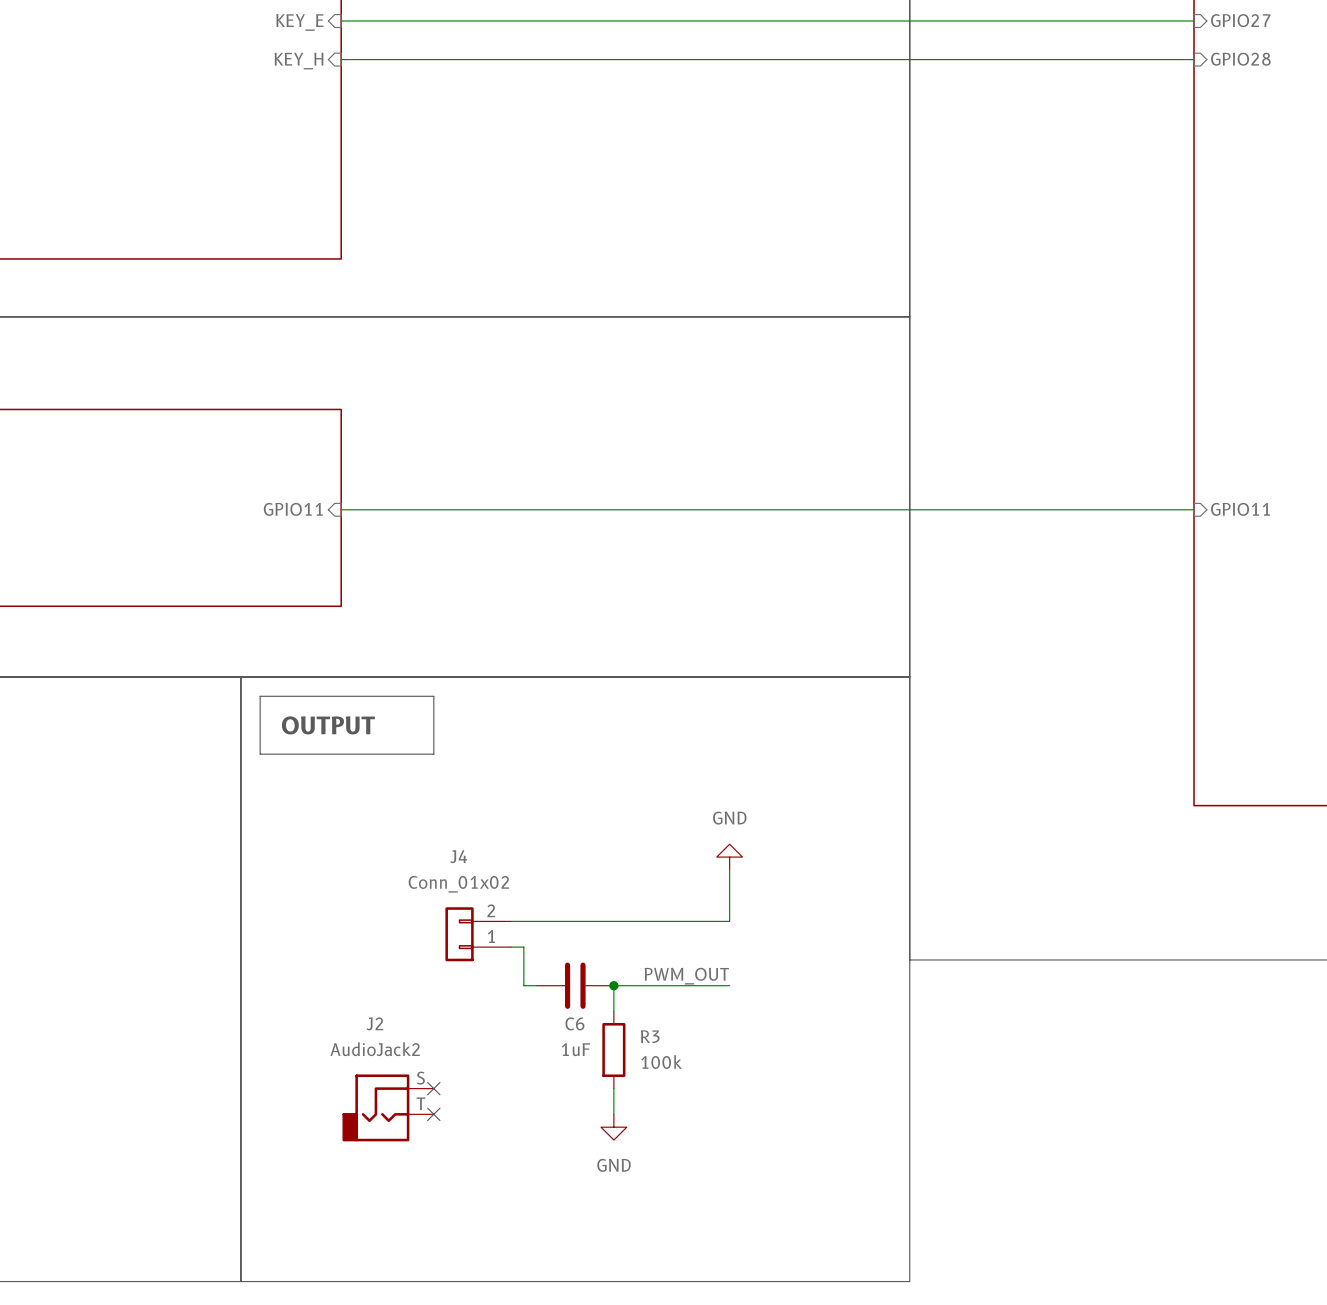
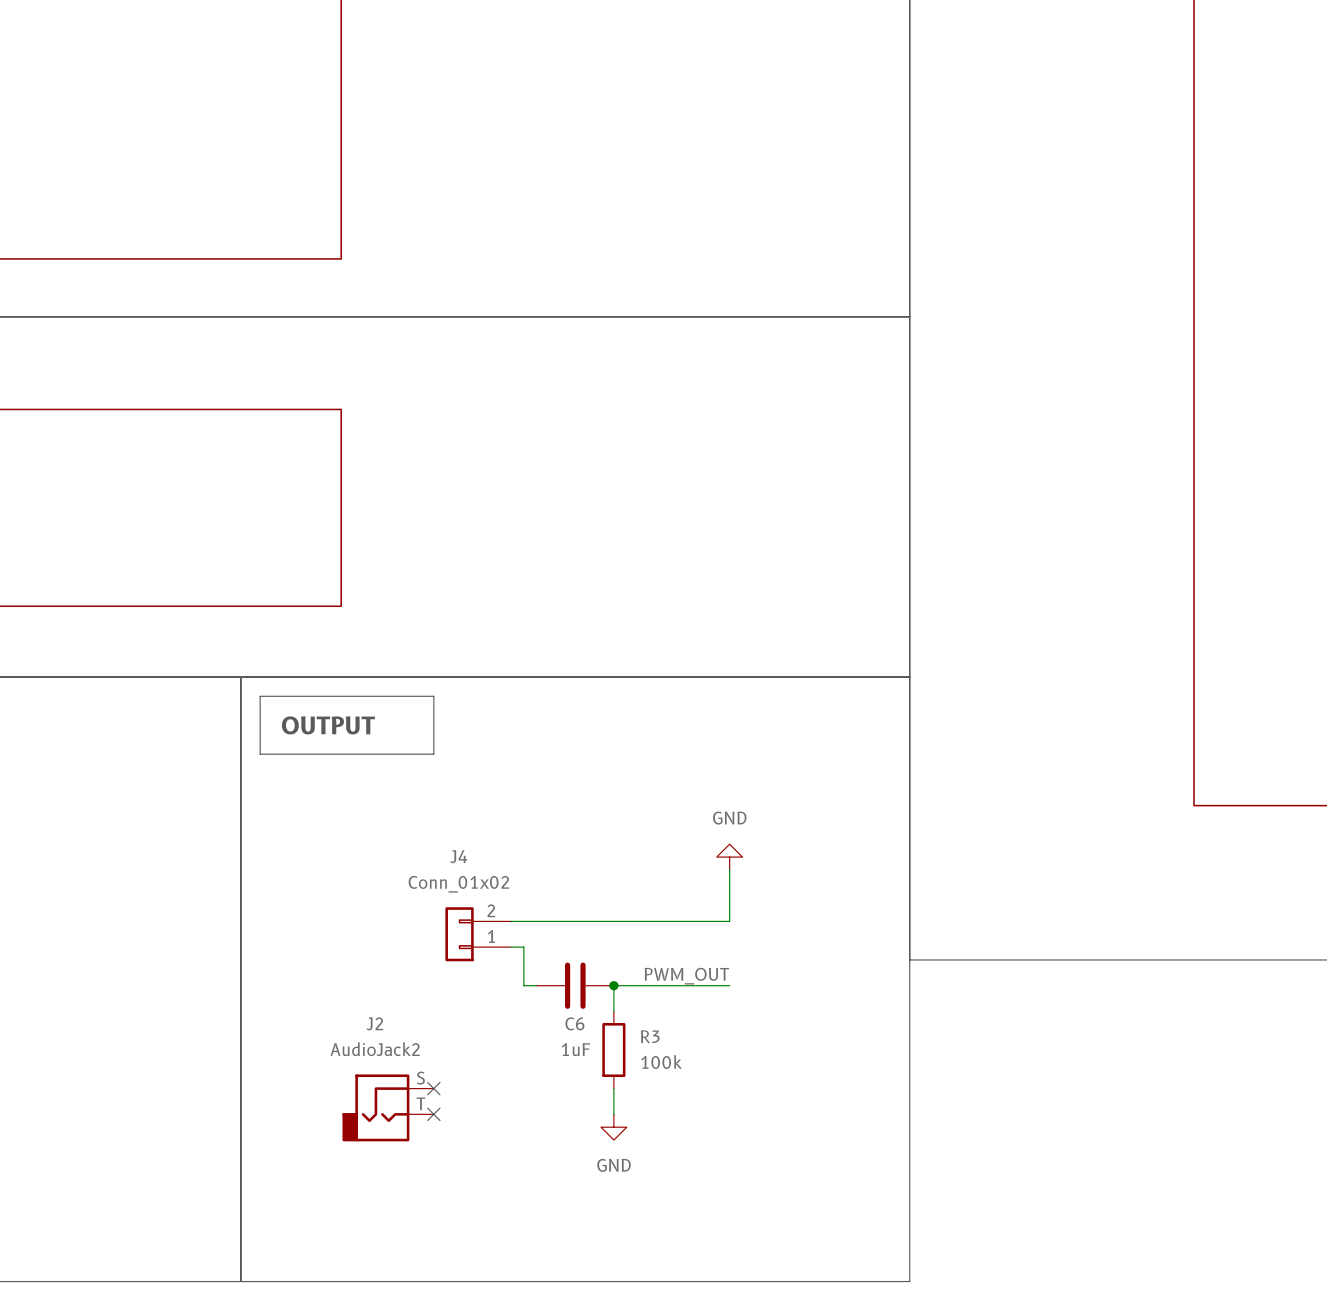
sheet pin: GPIO27 (1240, 20) -> none
wire: (341, 21) (1193, 21) -> none
sheet pin: KEY_E (299, 22) -> none
wire: (341, 59) (1193, 59) -> none
sheet pin: GPIO28 (1240, 59) -> none
sheet pin: KEY_H (298, 61) -> none
sheet pin: GPIO11 (293, 509) -> none
wire: (341, 509) (1193, 509) -> none
sheet pin: GPIO11 (1240, 509) -> none

